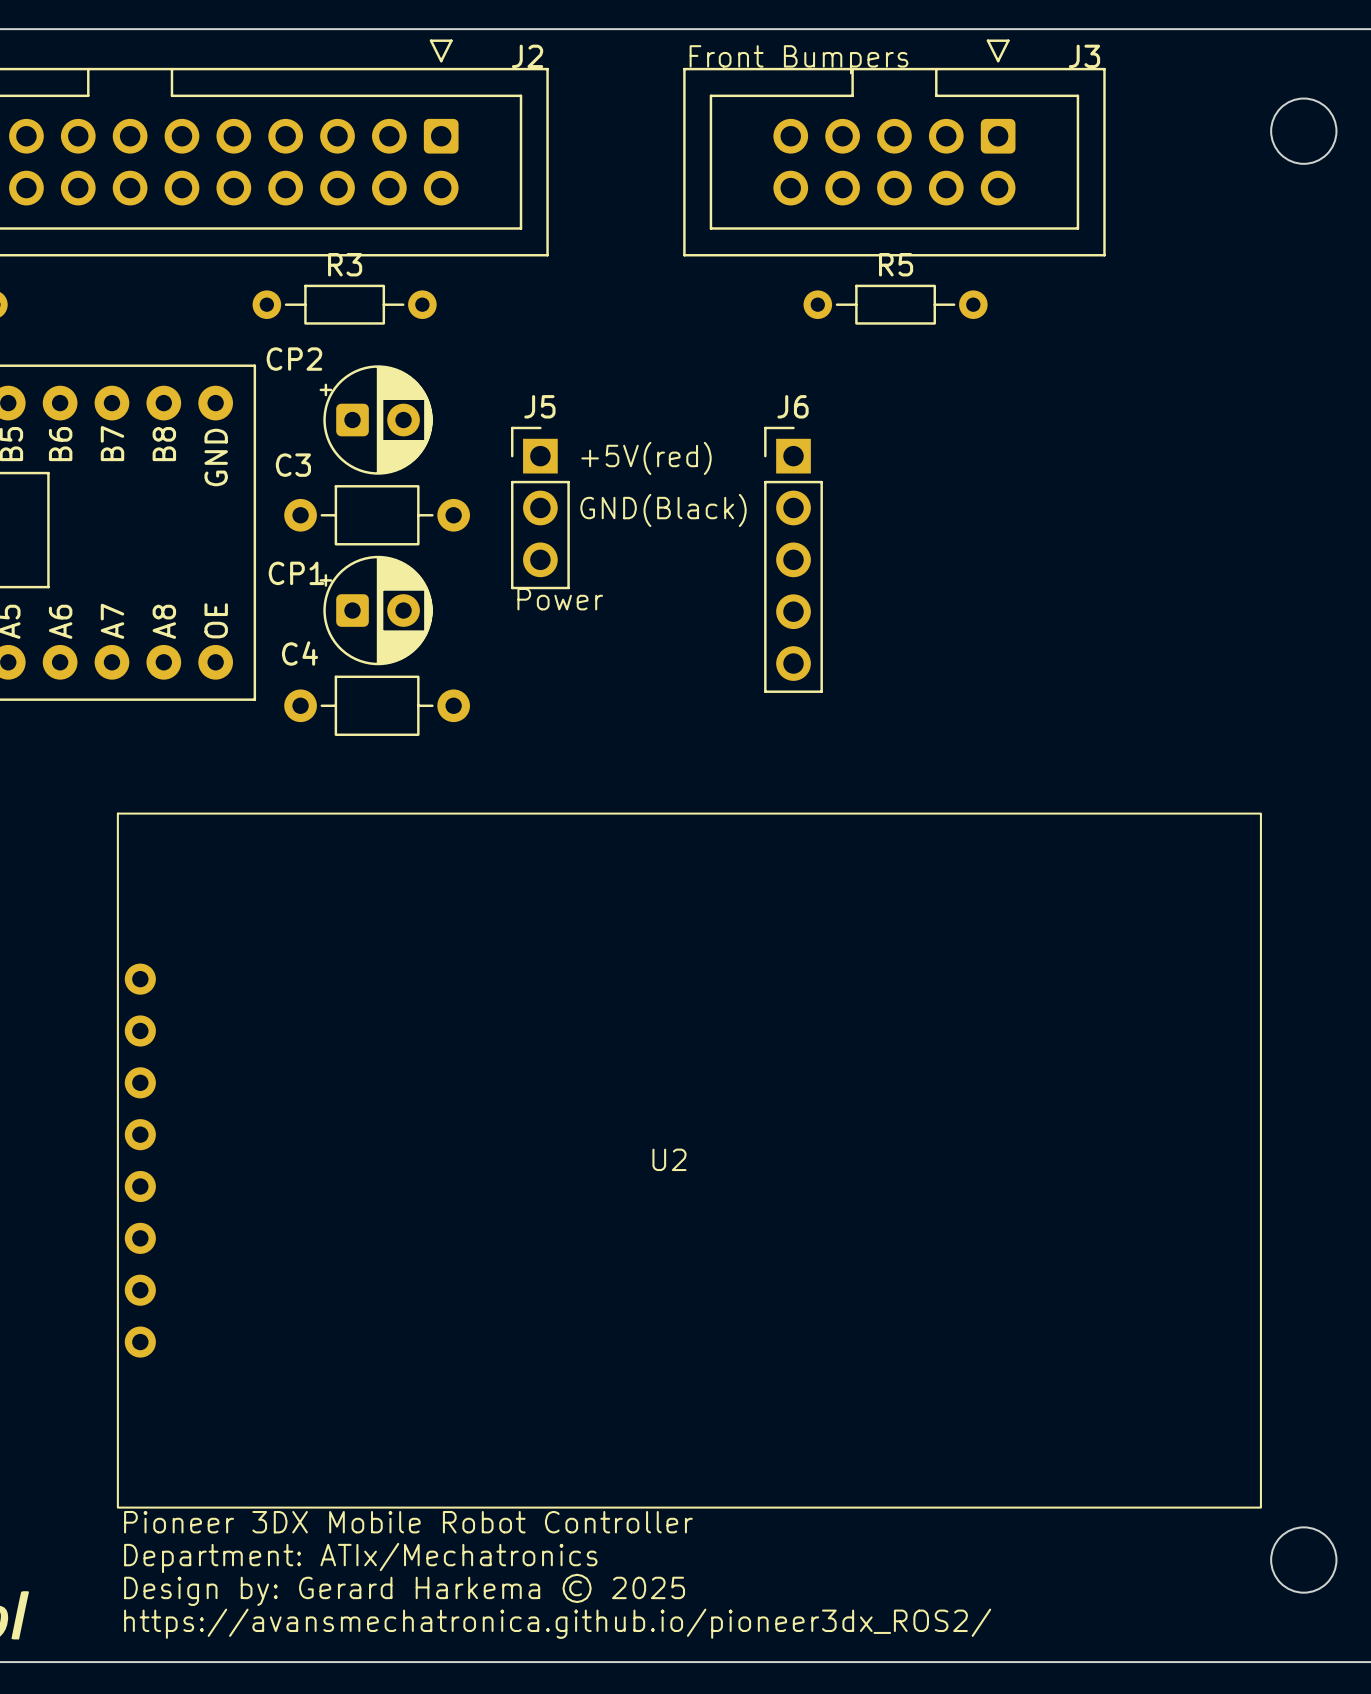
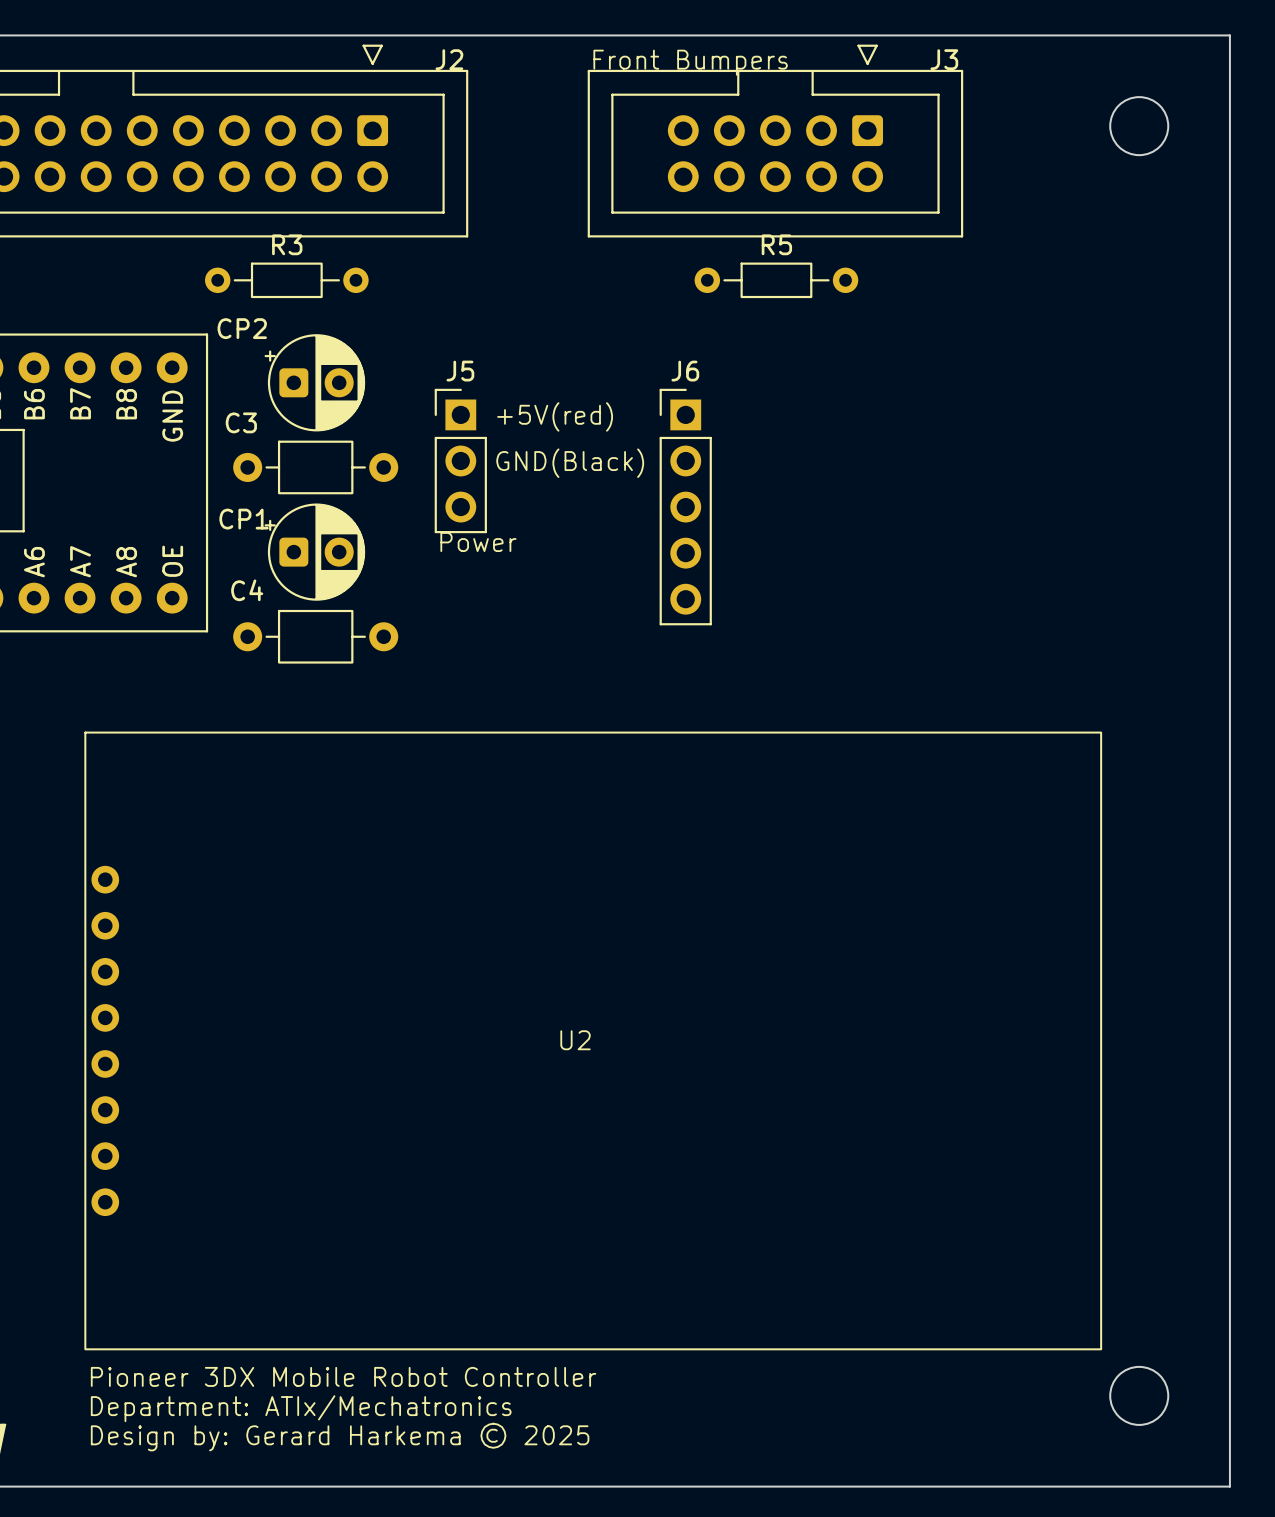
text position: Pioneer 3DX Mobile Robot Controller (408, 1522) -> Pioneer 3DX Mobile Robot Controller (343, 1376)
text position: Department: ATIx/Mechatronics (360, 1557) -> Department: ATIx/Mechatronics (301, 1408)
text position: Design by: Gerard Harkema © 2025 (404, 1589) -> Design by: Gerard Harkema © 2025 (340, 1437)
text: https://avansmechatronica.github.io/pioneer3dx_ROS2/ (557, 1623) -> none

